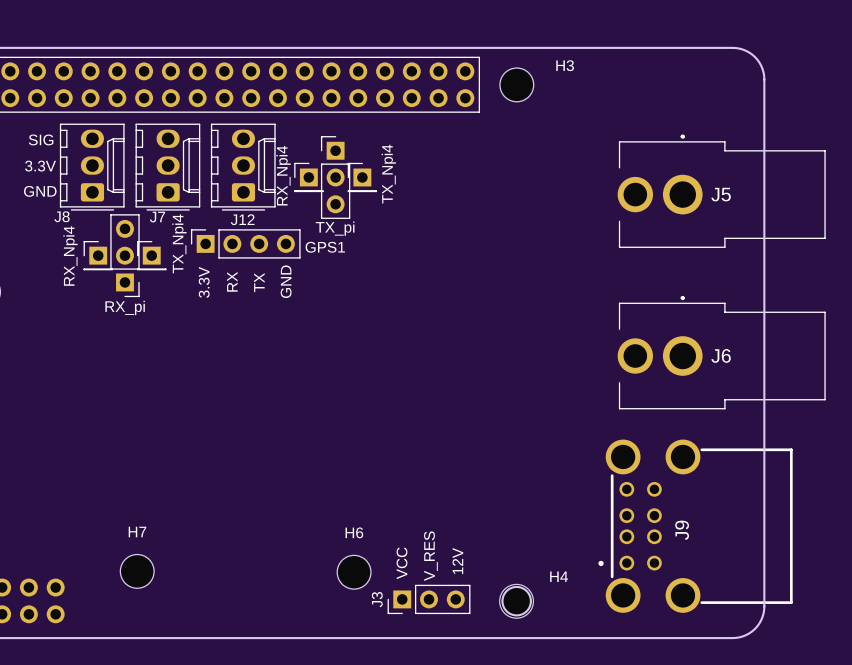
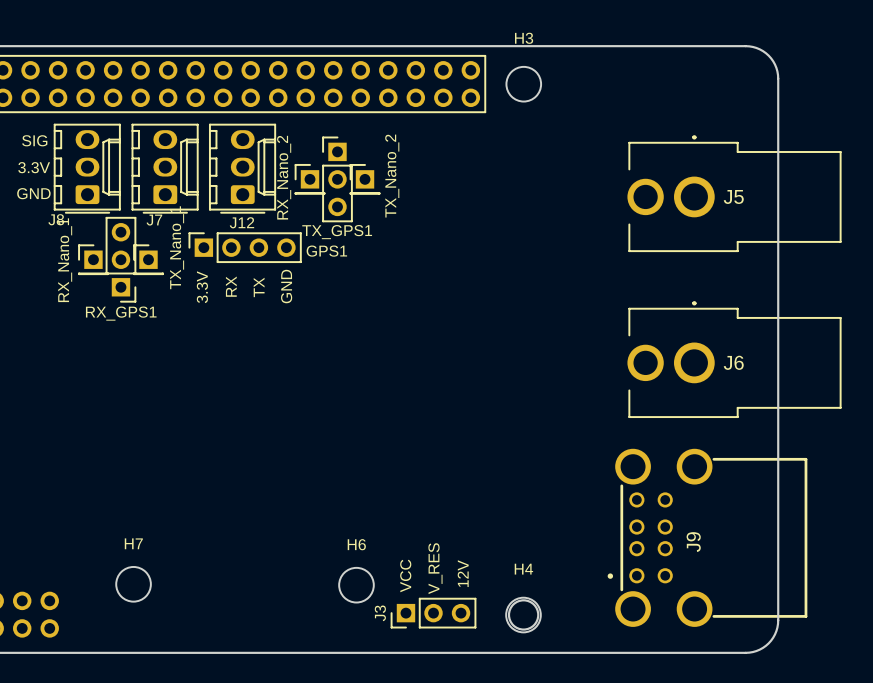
H3 name position: H3 (565, 65) -> H3 (524, 38)
TX_Npi4 name: TX_Npi4 (388, 174) -> TX_Nano_2 (392, 176)
RX_Npi4 name: RX_Npi4 (283, 175) -> RX_Nano_2 (284, 177)
TX_pi name: TX_pi (335, 228) -> TX_GPS1 (337, 232)
TX_Npi4 name: TX_Npi4 (179, 243) -> TX_Nano_1 (177, 247)
RX_Npi4 name: RX_Npi4 (70, 255) -> RX_Nano_1 (65, 260)
RX_pi name: RX_pi (125, 307) -> RX_GPS1 (121, 313)
H4 name position: H4 (559, 576) -> H4 (523, 569)

